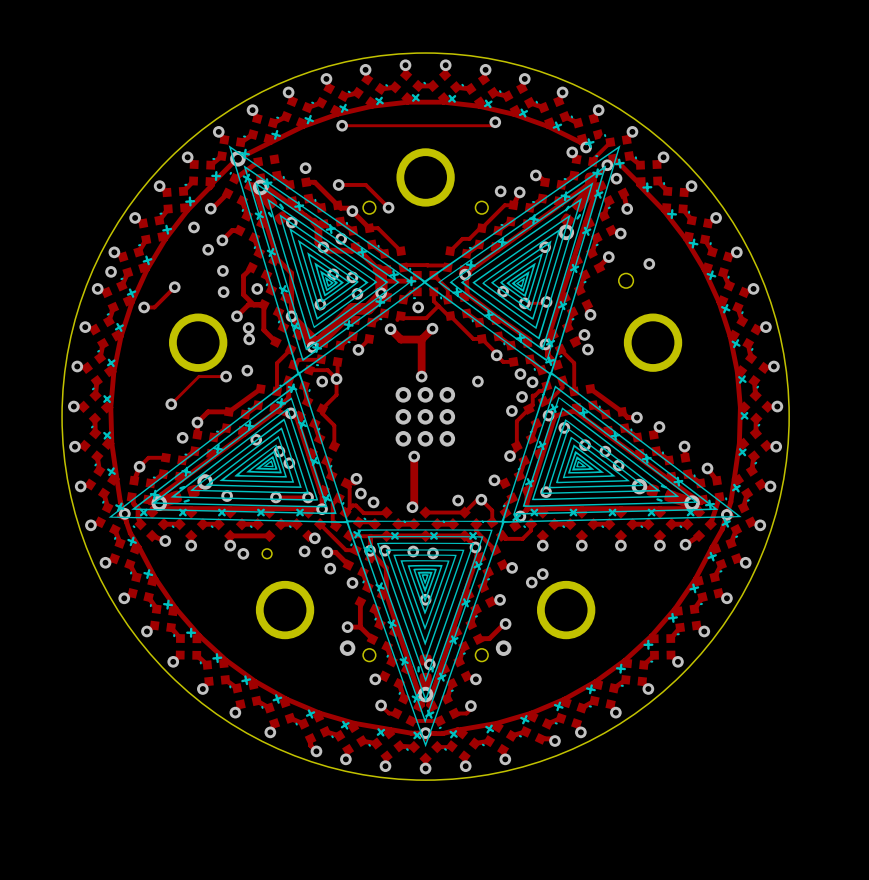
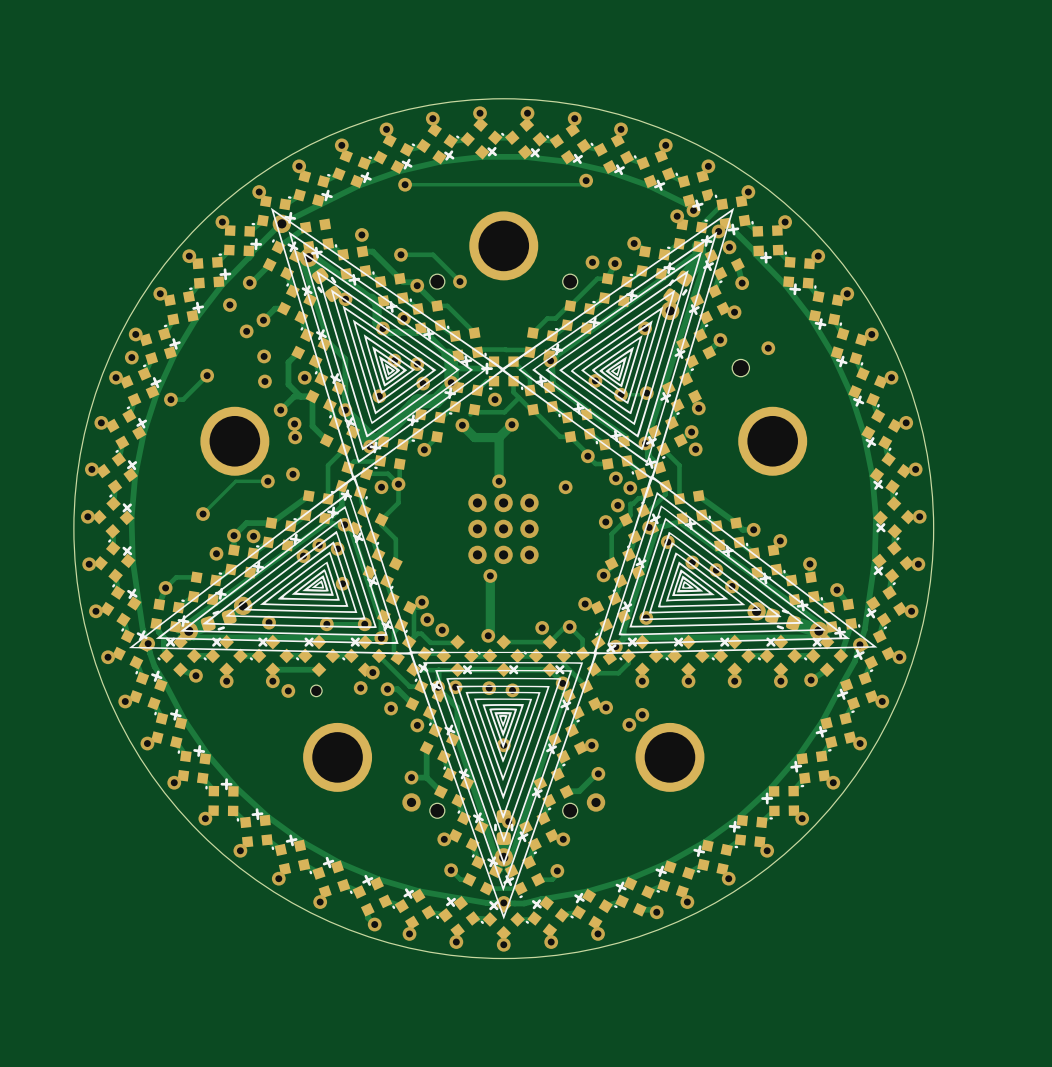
via: none -> (253, 536)
via: none -> (319, 545)
via: none -> (337, 548)
via: (279, 451) -> none

